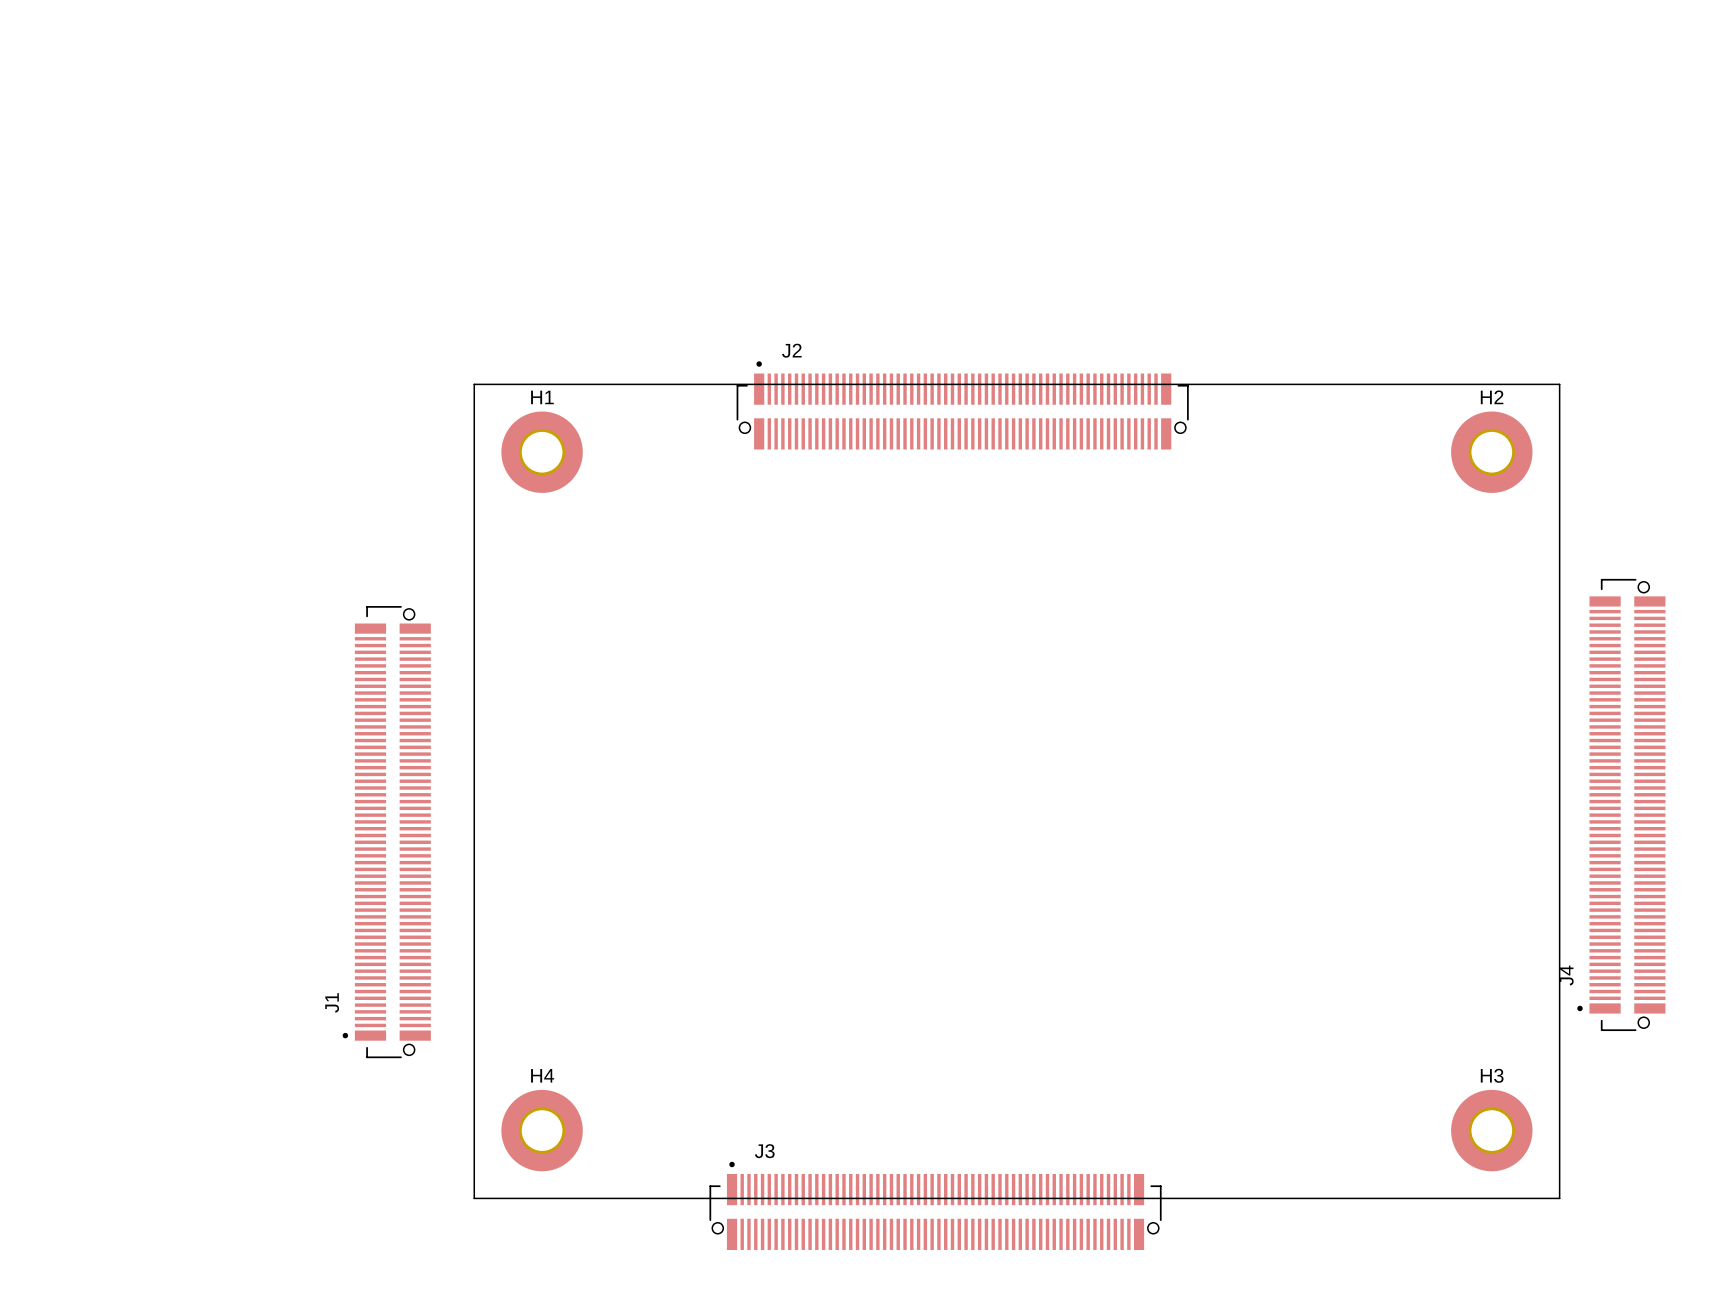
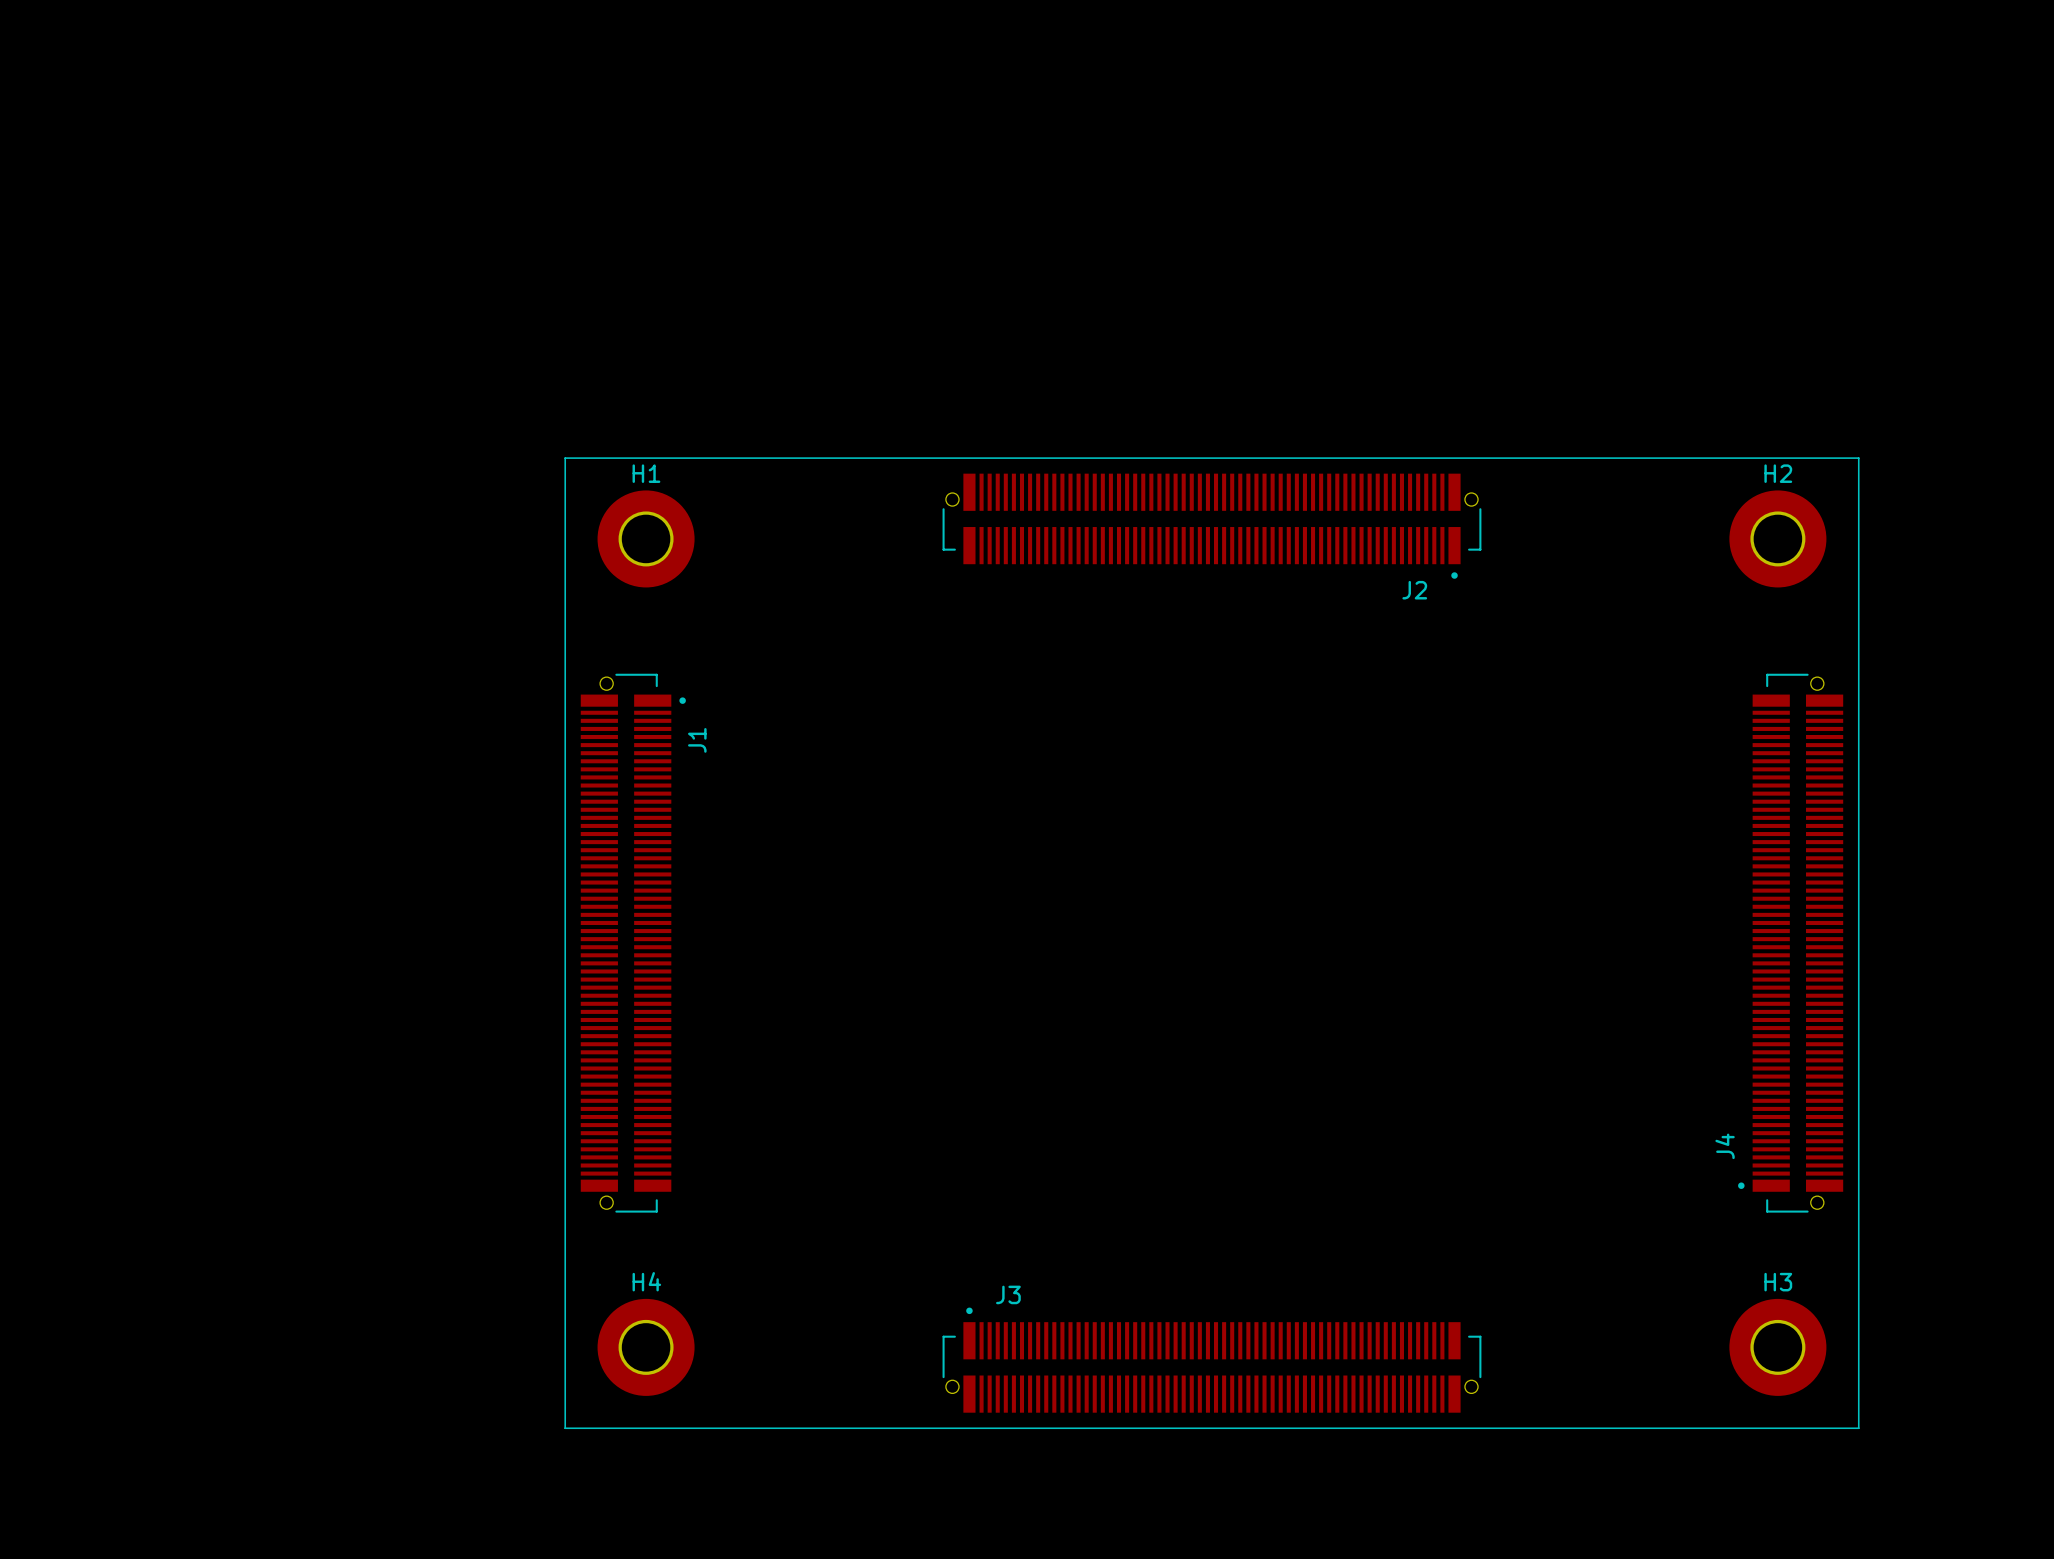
board edge: (474, 384) (1559, 384) (1559, 1198) (474, 1198) (474, 384) -> none
line: none -> (565, 458) (1858, 458) (1858, 1428) (565, 1428) (565, 458)
J2 rotation: 0° (962, 405) -> 180° (1211, 526)
J4 position: (1621, 804) -> (1790, 943)
J1 rotation: 0° (386, 832) -> 180° (633, 943)
J3 position: (935, 1205) -> (1211, 1360)

